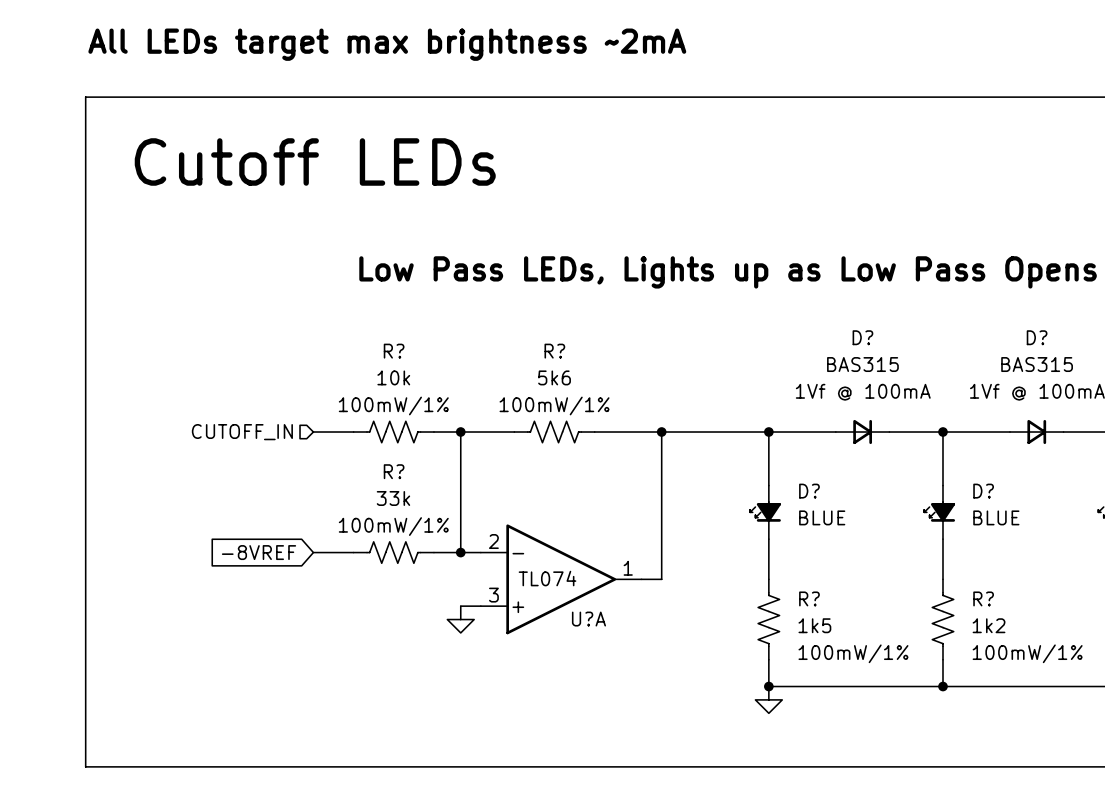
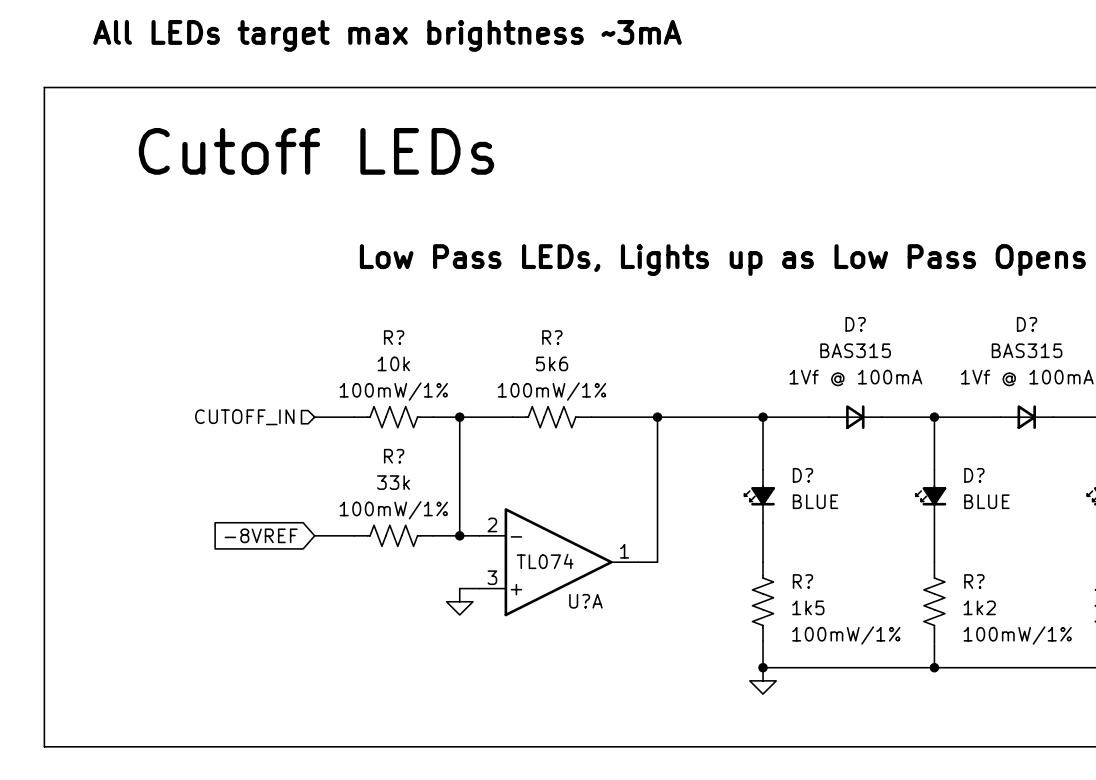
text: All LEDs target max brightness ~2mA (387, 44) -> All LEDs target max brightness ~3mA (387, 35)
line: (85, 97) (85, 766) -> (90, 87) (44, 87) (44, 746) (90, 746)

